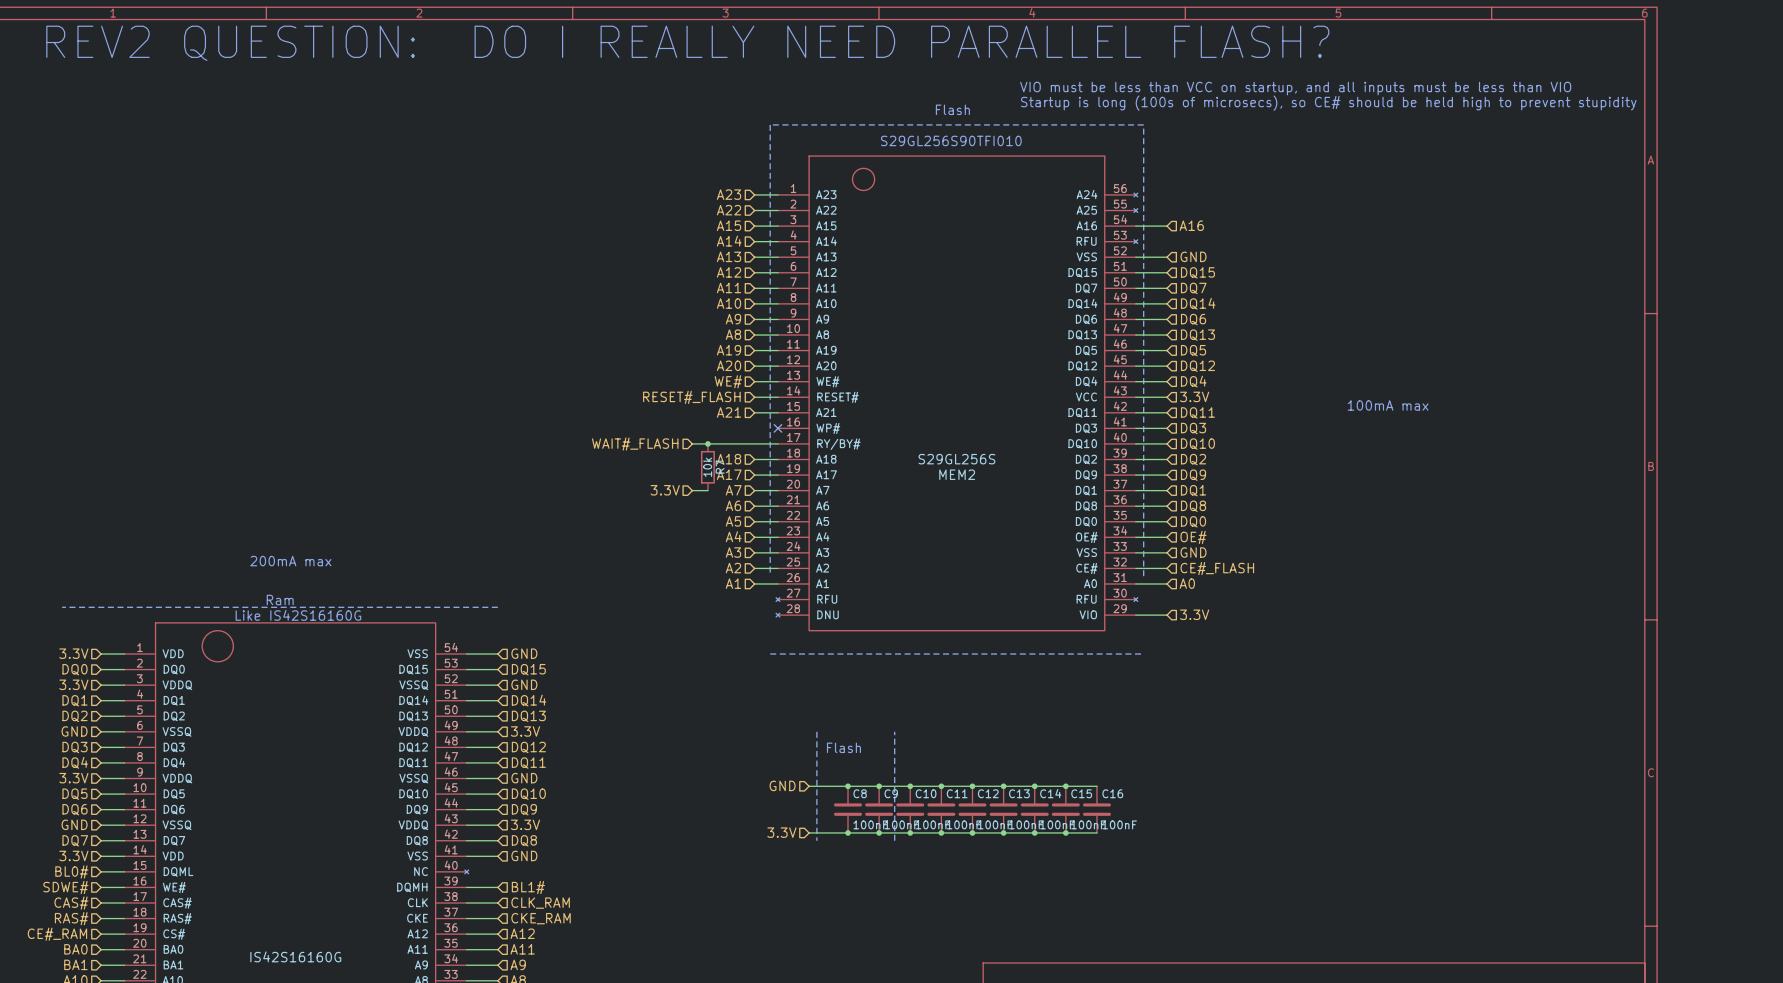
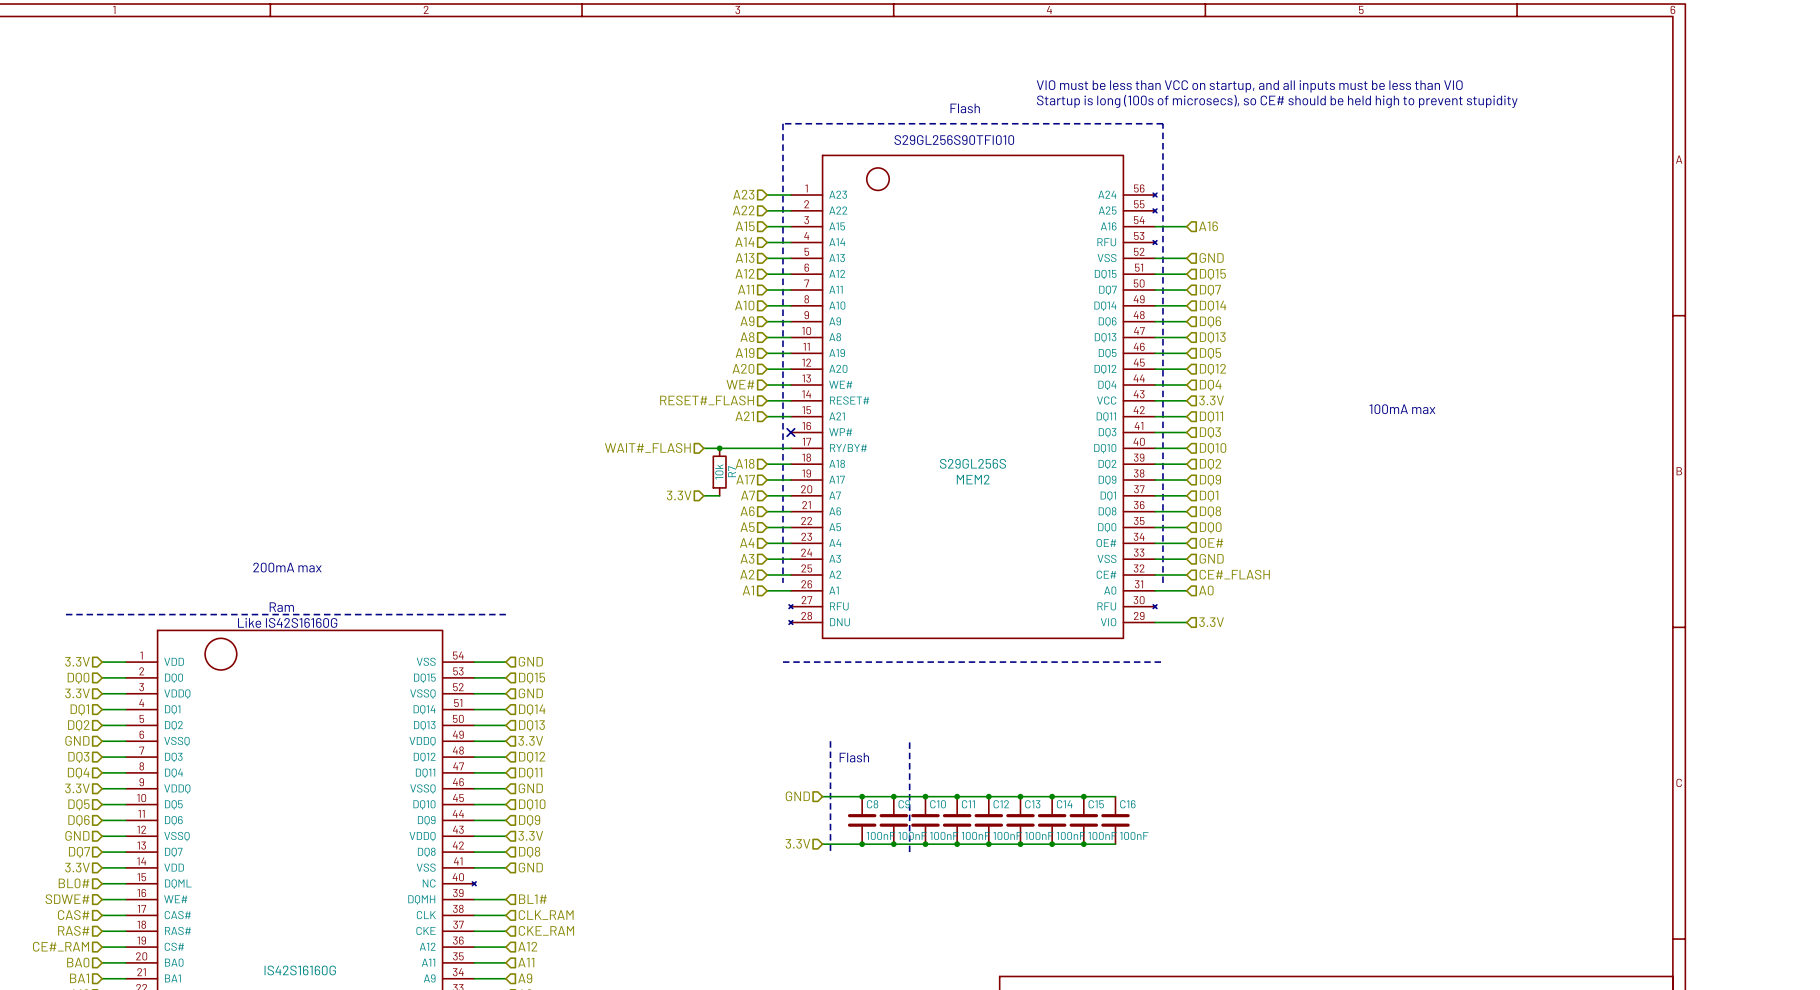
text: REV2 QUESTION: DO I REALLY NEED PARALLEL FLASH? (687, 43) -> none

